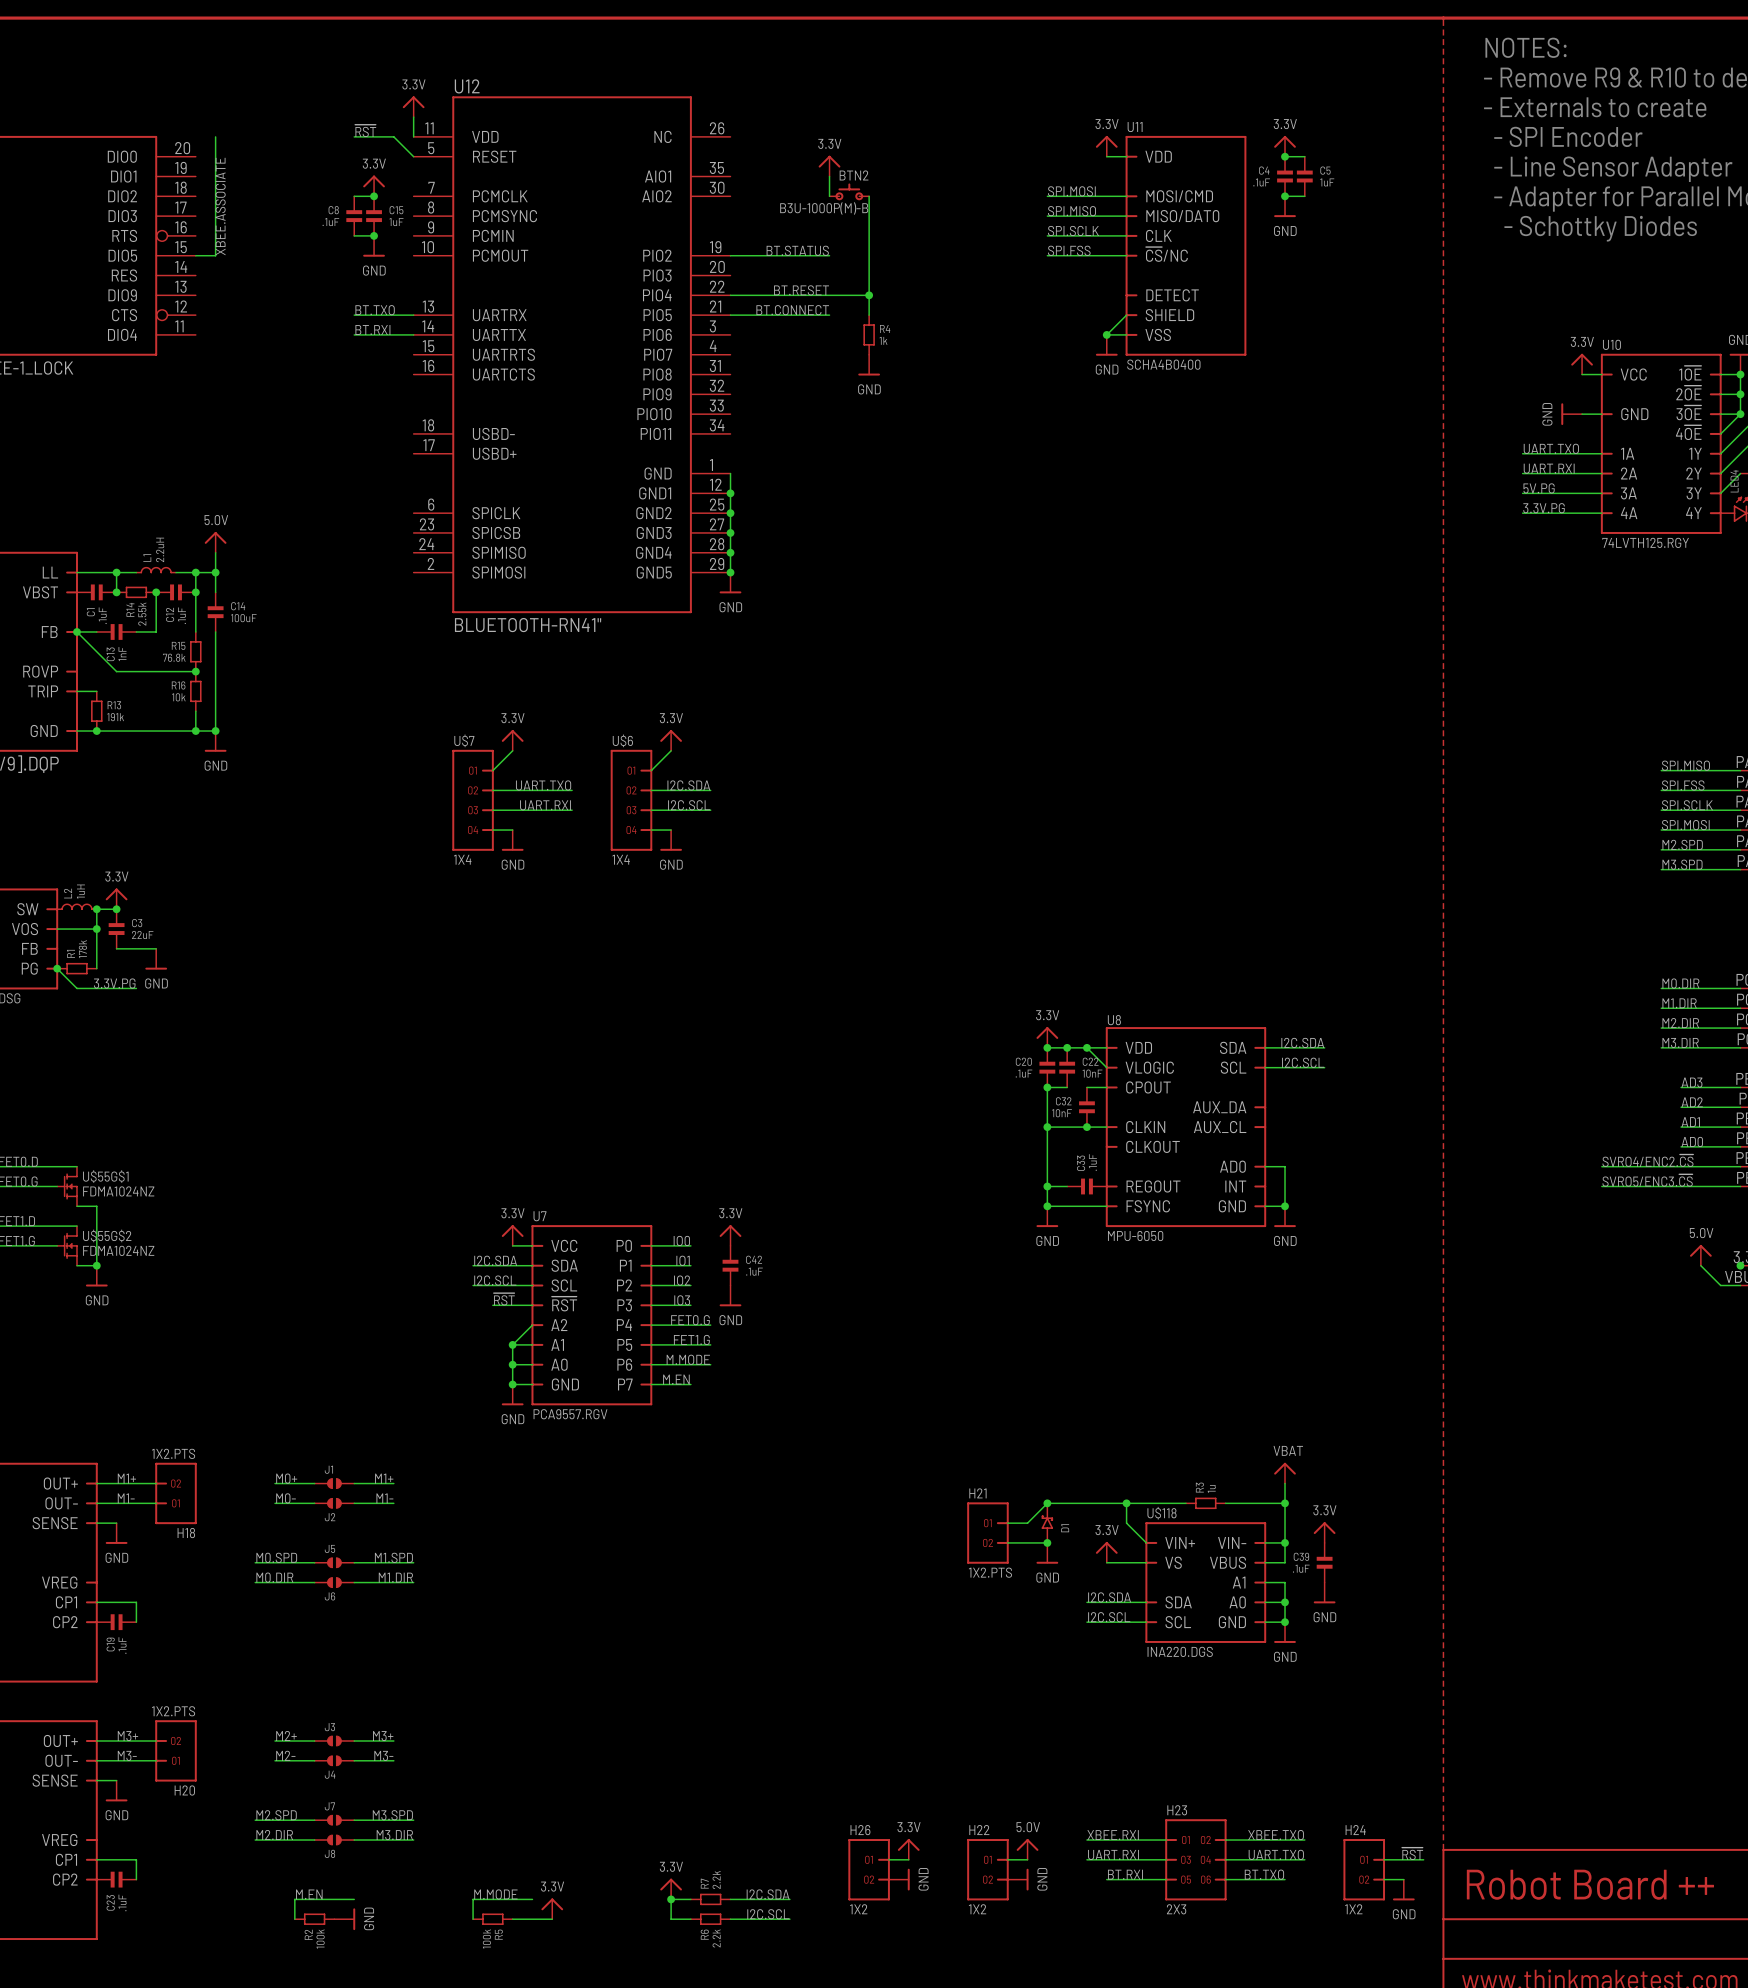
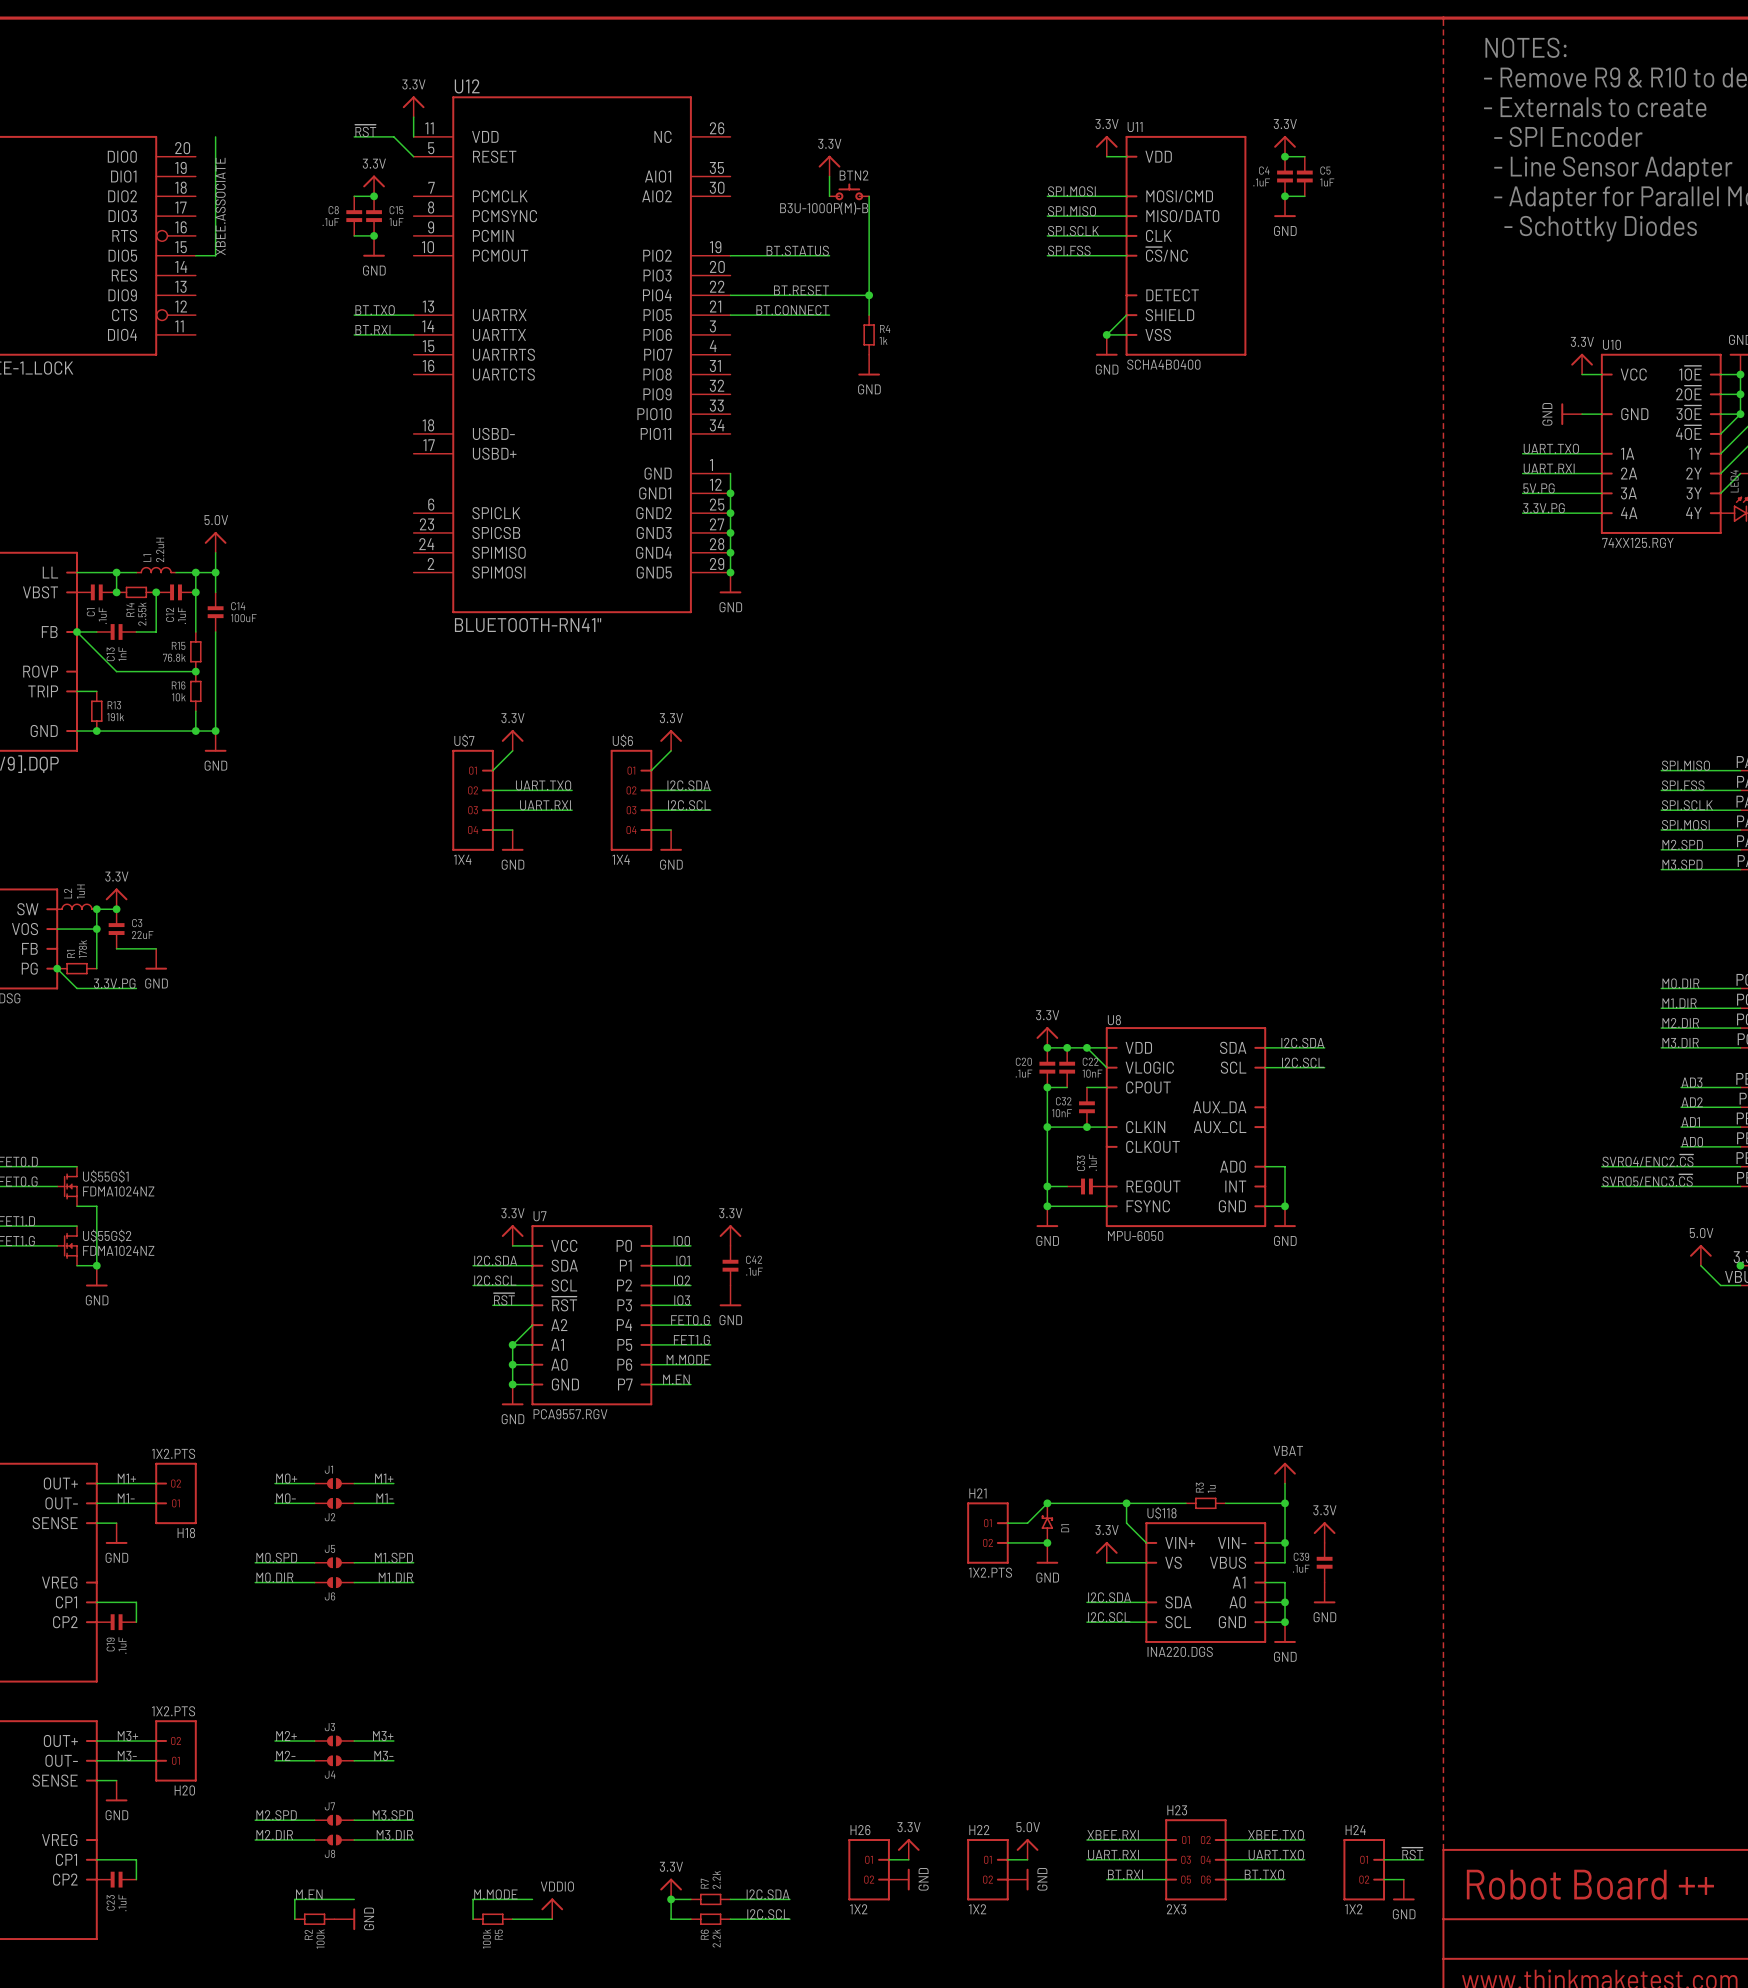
U10 value: 74LVTH125.RGY (1645, 542) -> 74XX125.RGY (1637, 542)
power symbol: 3.3V (552, 1908) -> VDDIO (552, 1908)

